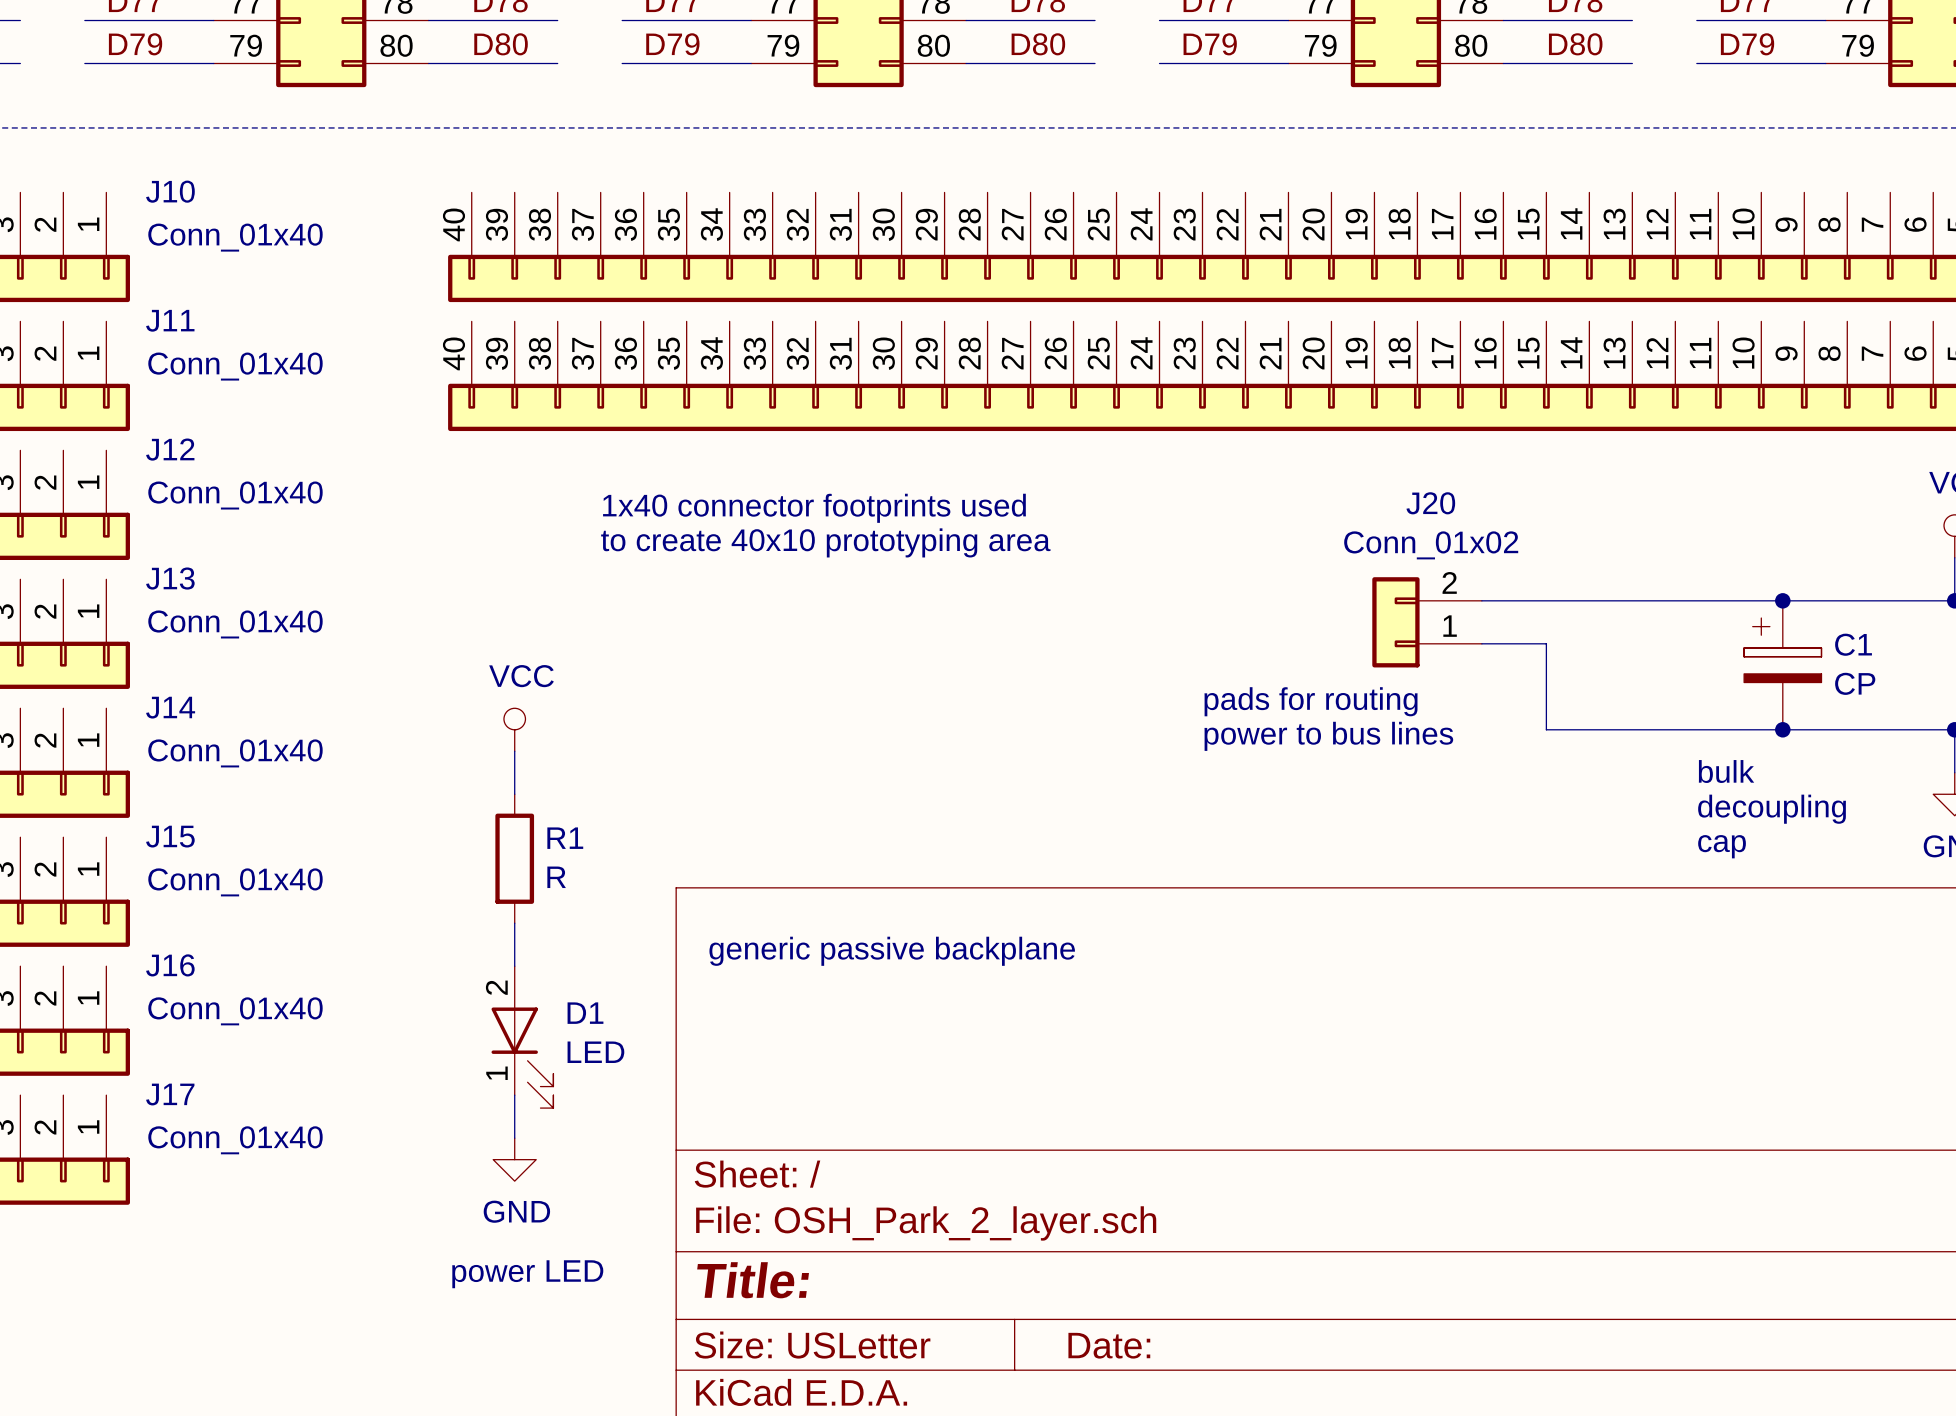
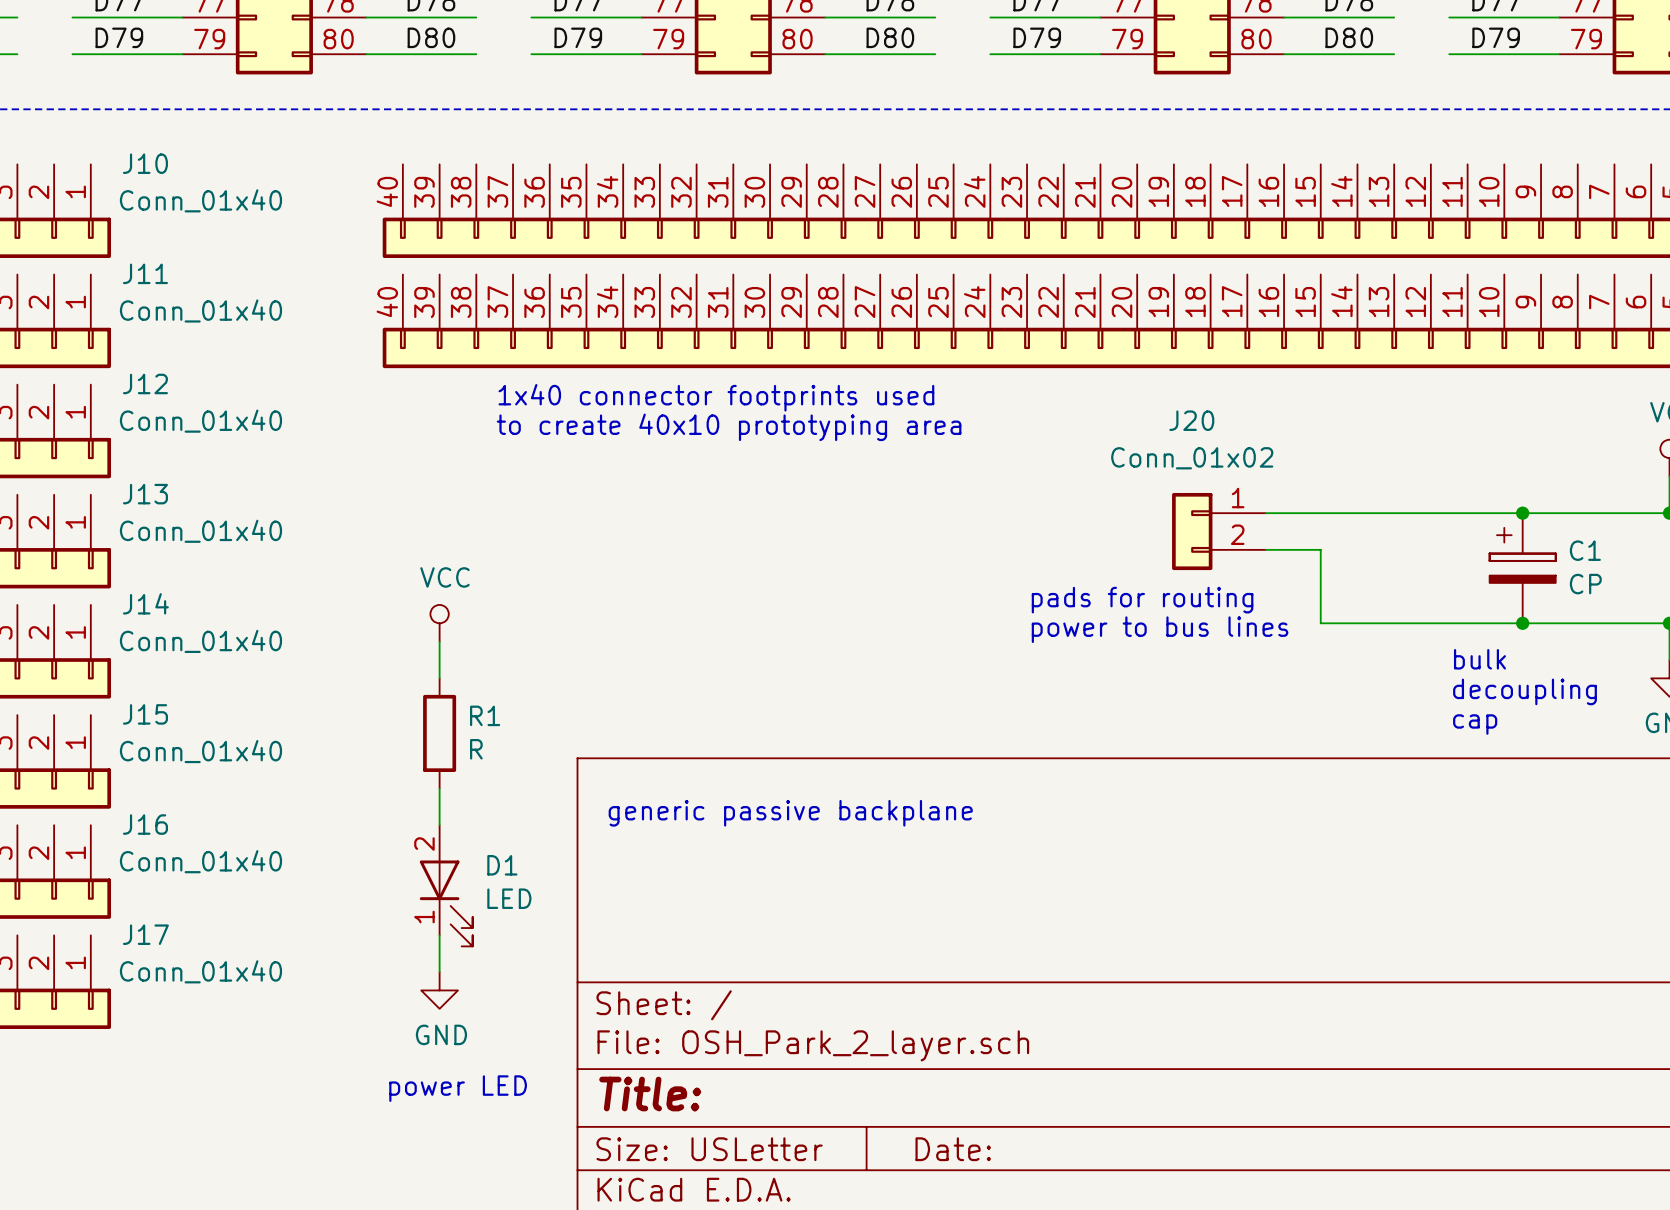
J20 name position: J20 (1430, 503) -> J20 (1191, 420)
text position: 1x40 connector footprints used (814, 508) -> 1x40 connector footprints used (716, 397)
text position: to create 40x10 prototyping area (825, 542) -> to create 40x10 prototyping area (729, 427)
J20 value position: Conn_01x02 (1431, 545) -> Conn_01x02 (1192, 458)
J20 flip: as is (1395, 622) -> up-down (1192, 531)

